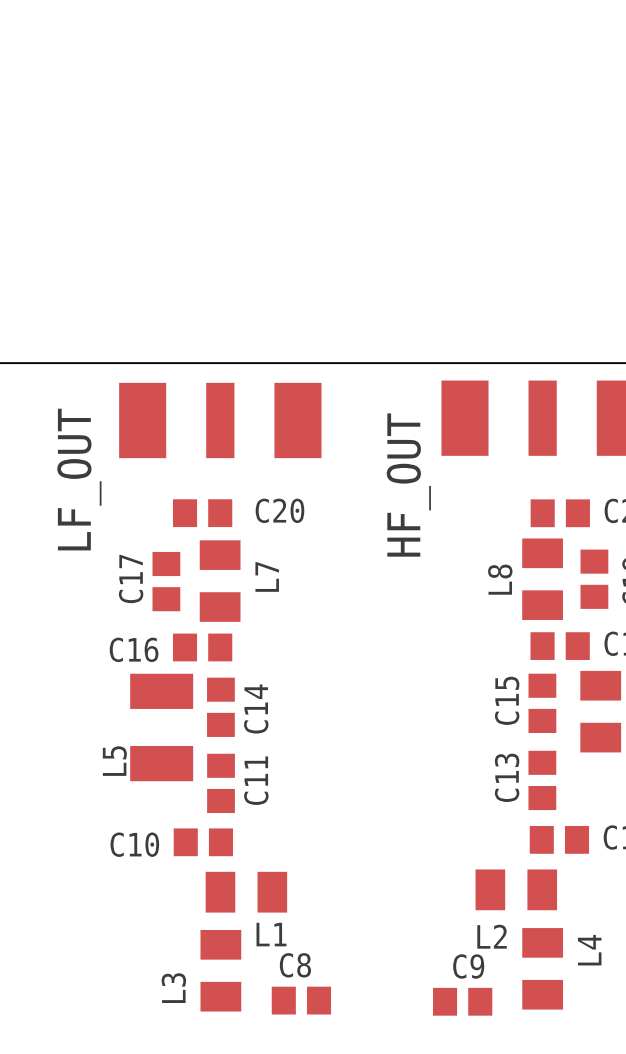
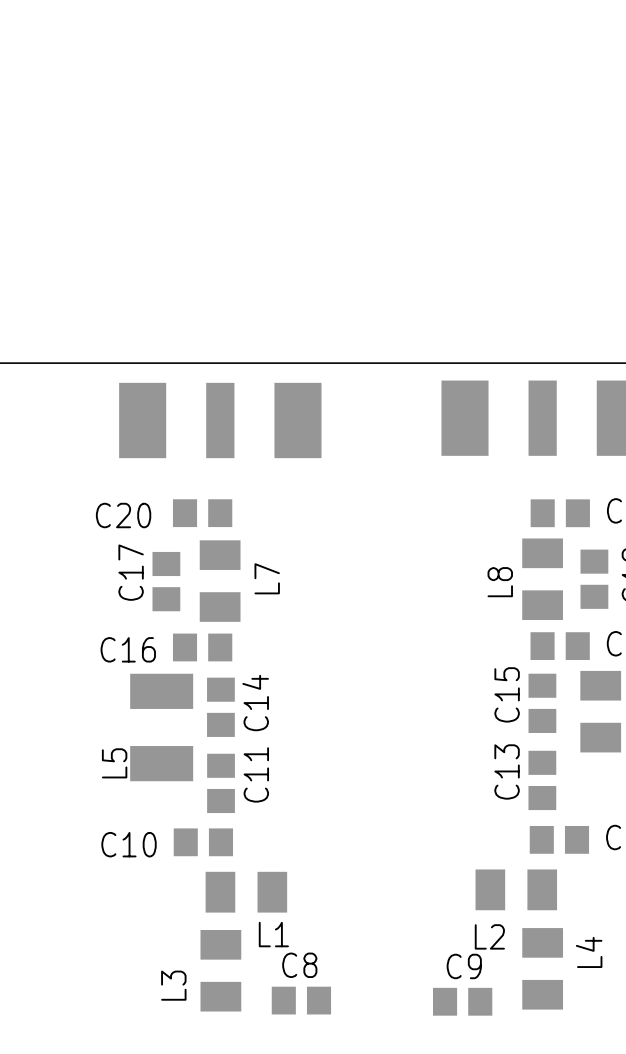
text: LF_OUT (79, 479) -> none
text: HF_OUT (408, 485) -> none
C20 name position: C20 (279, 510) -> C20 (123, 515)

